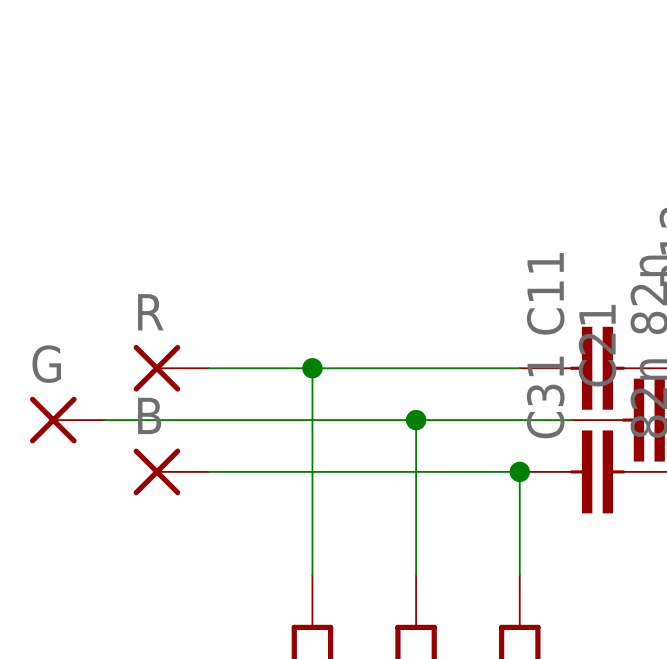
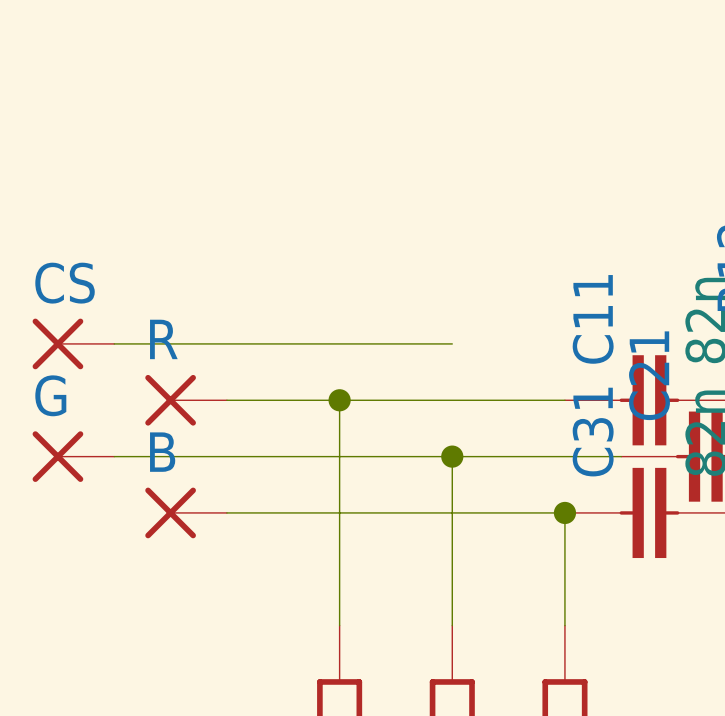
CS: none -> (73, 343)
wire: none -> (114, 343) (452, 343)

